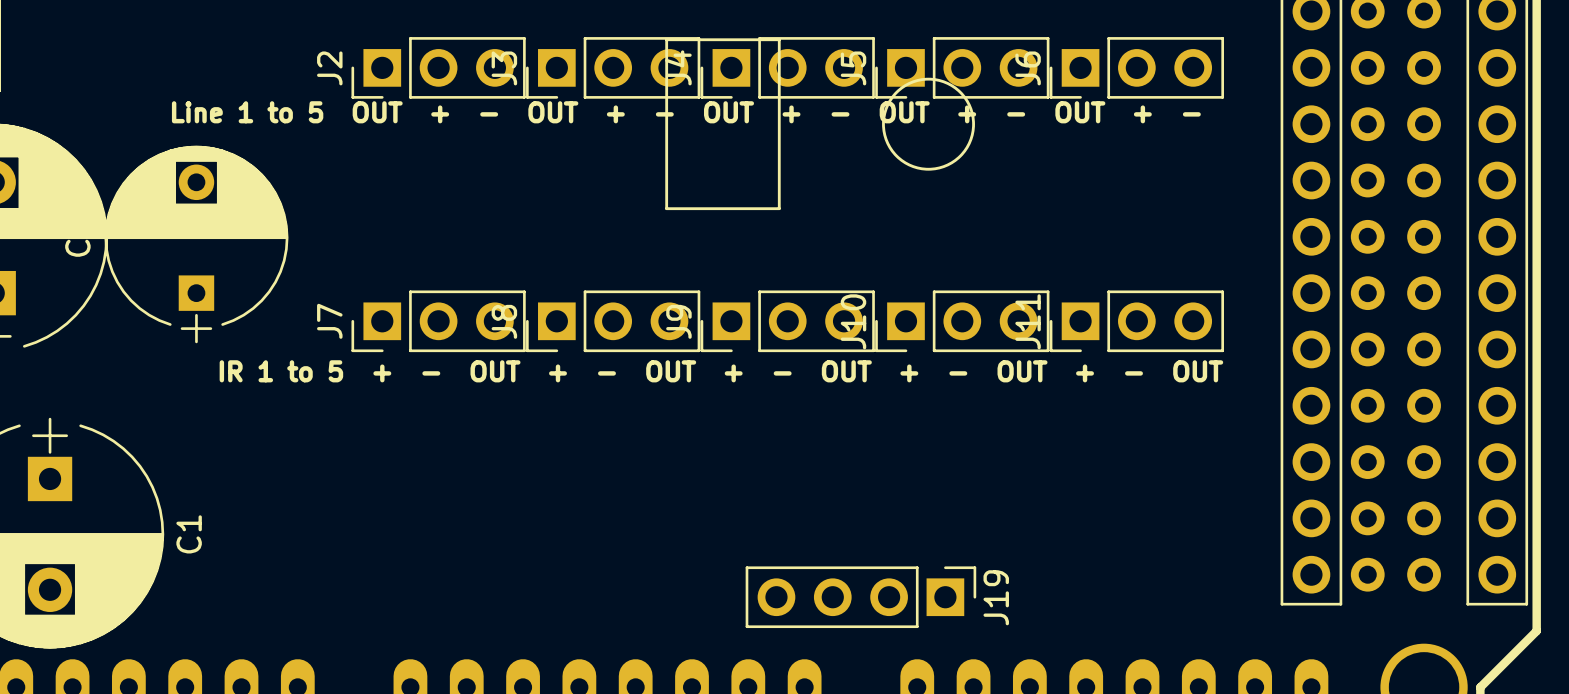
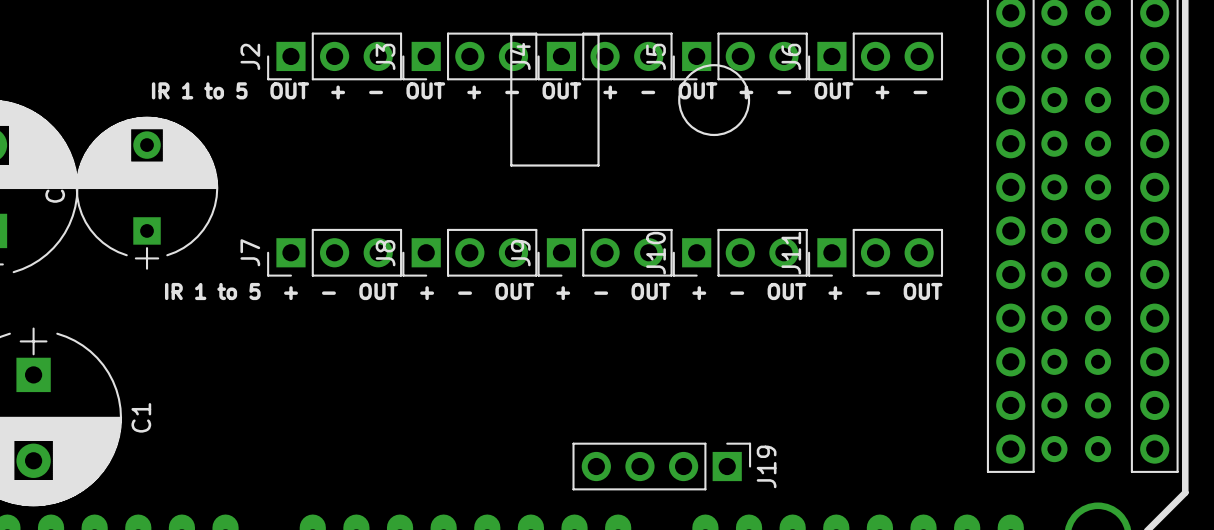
text: Line 1 to 5 OUT + - OUT + - OUT + - OUT + - OUT + - (686, 112) -> IR 1 to 5 OUT + - OUT + - OUT + - OUT + - OUT + - (539, 90)

